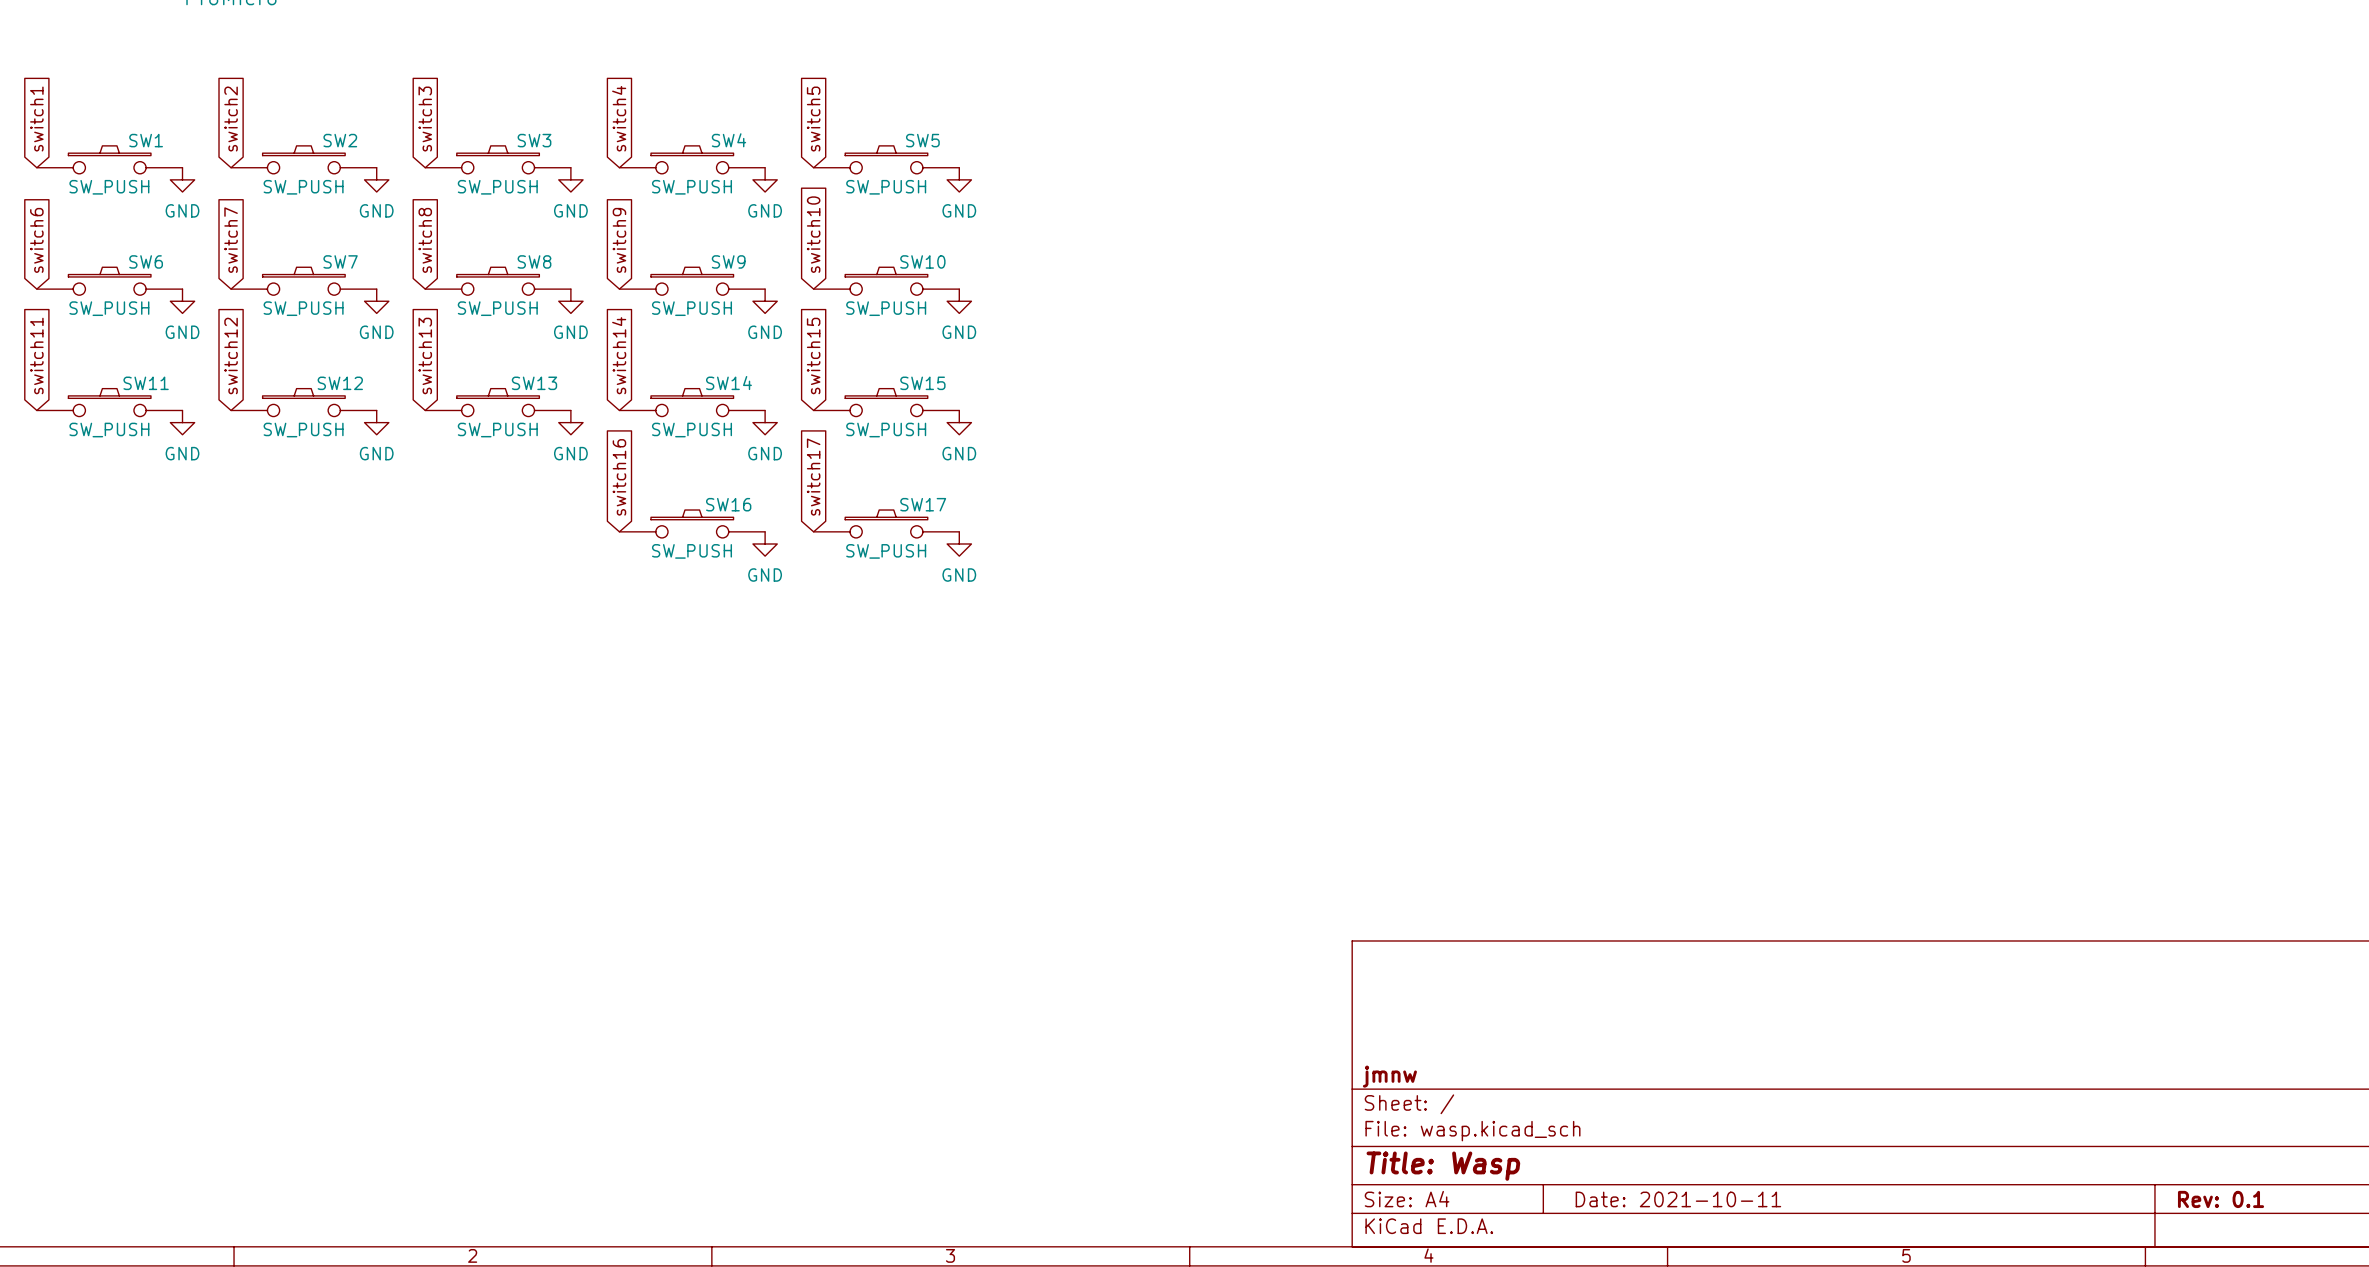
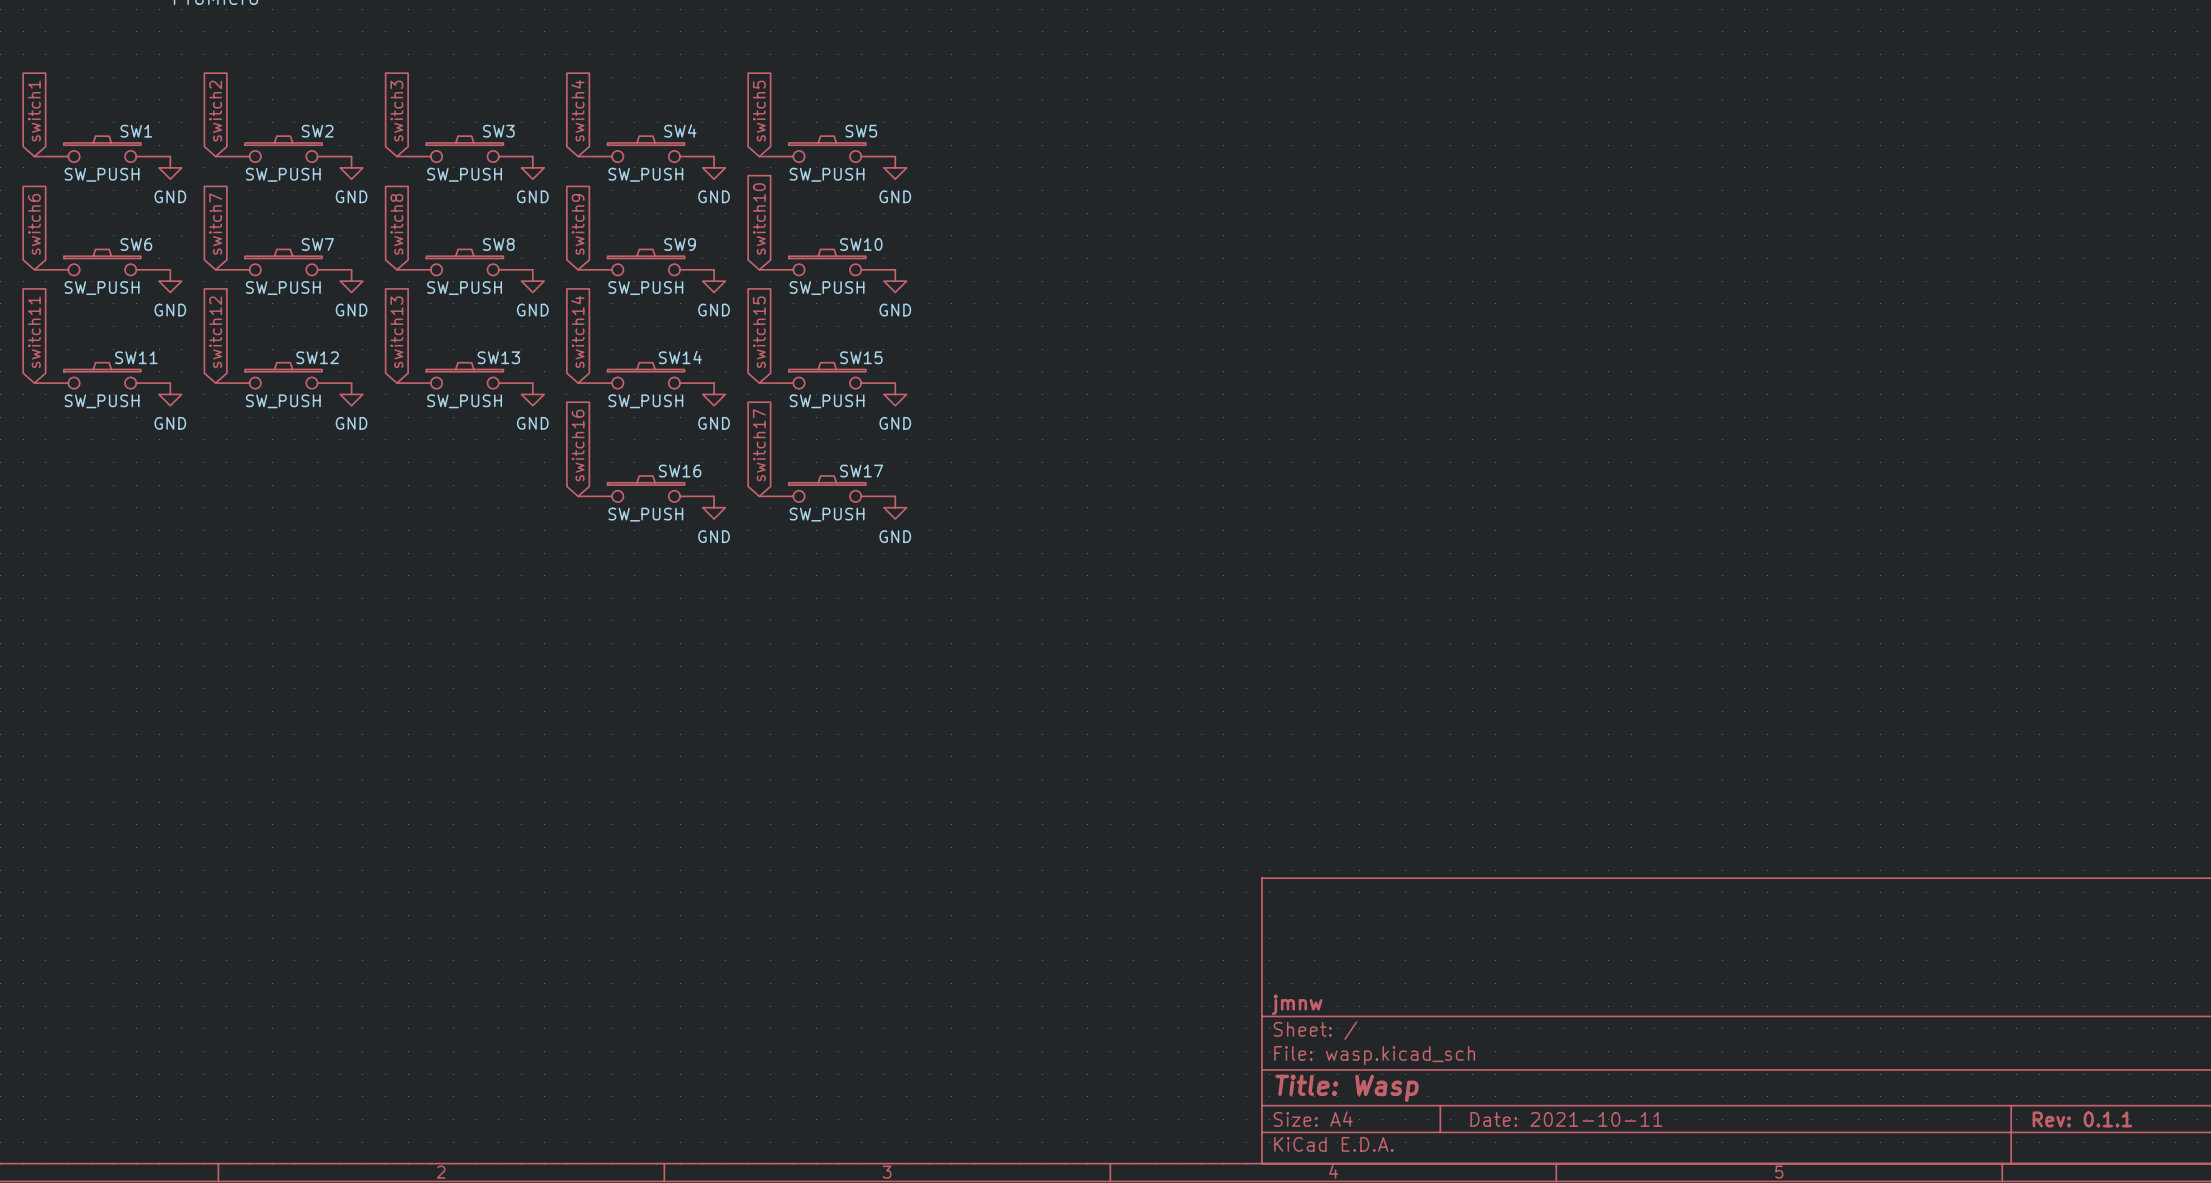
title block: Rev: 0.1 (2221, 1199) -> Rev: 0.1.1 (2082, 1119)

